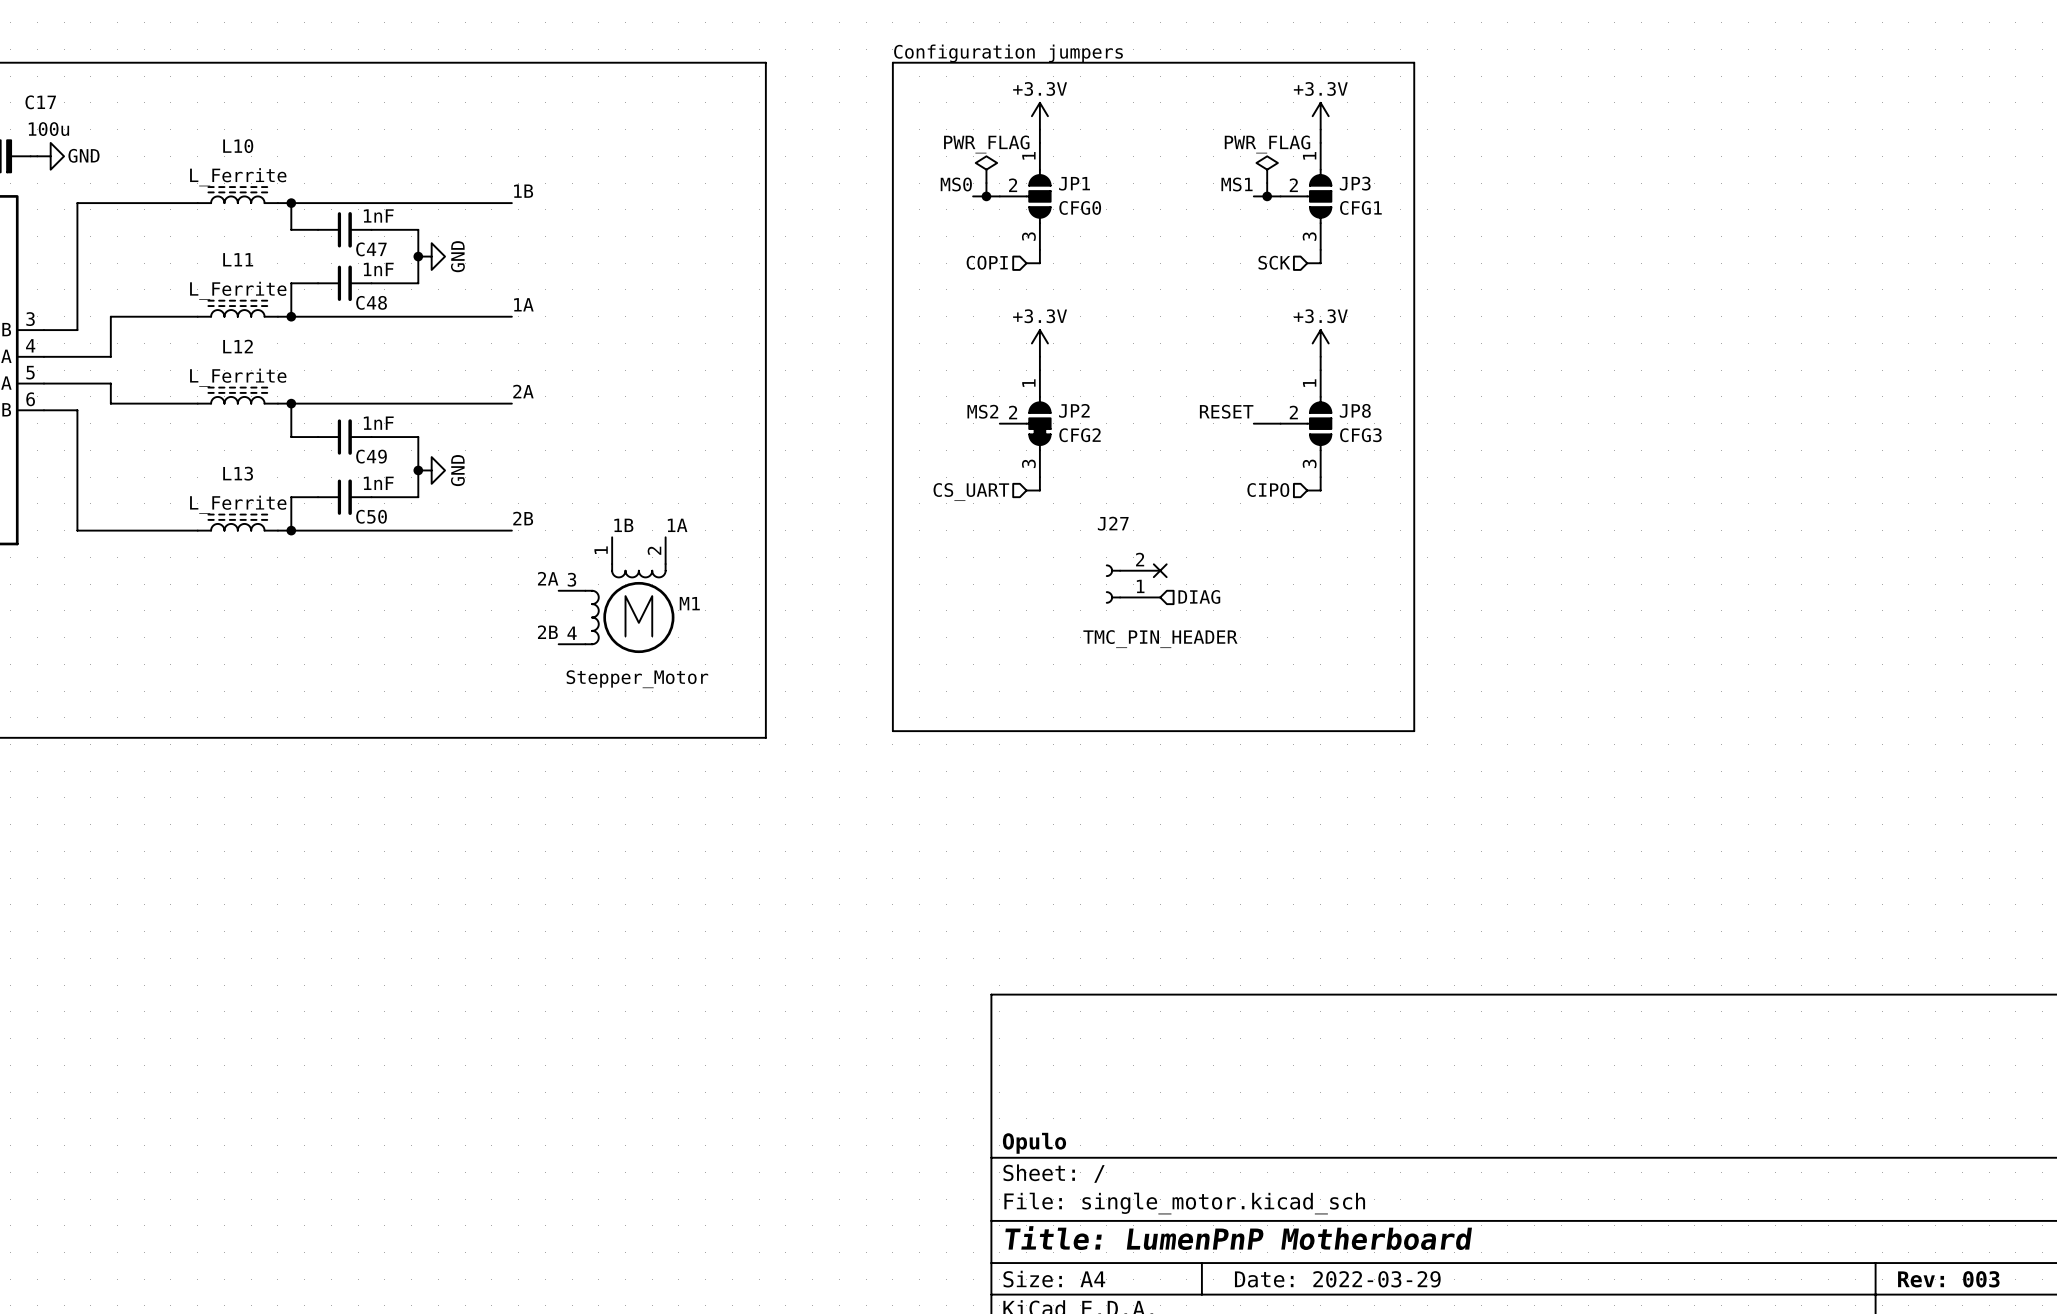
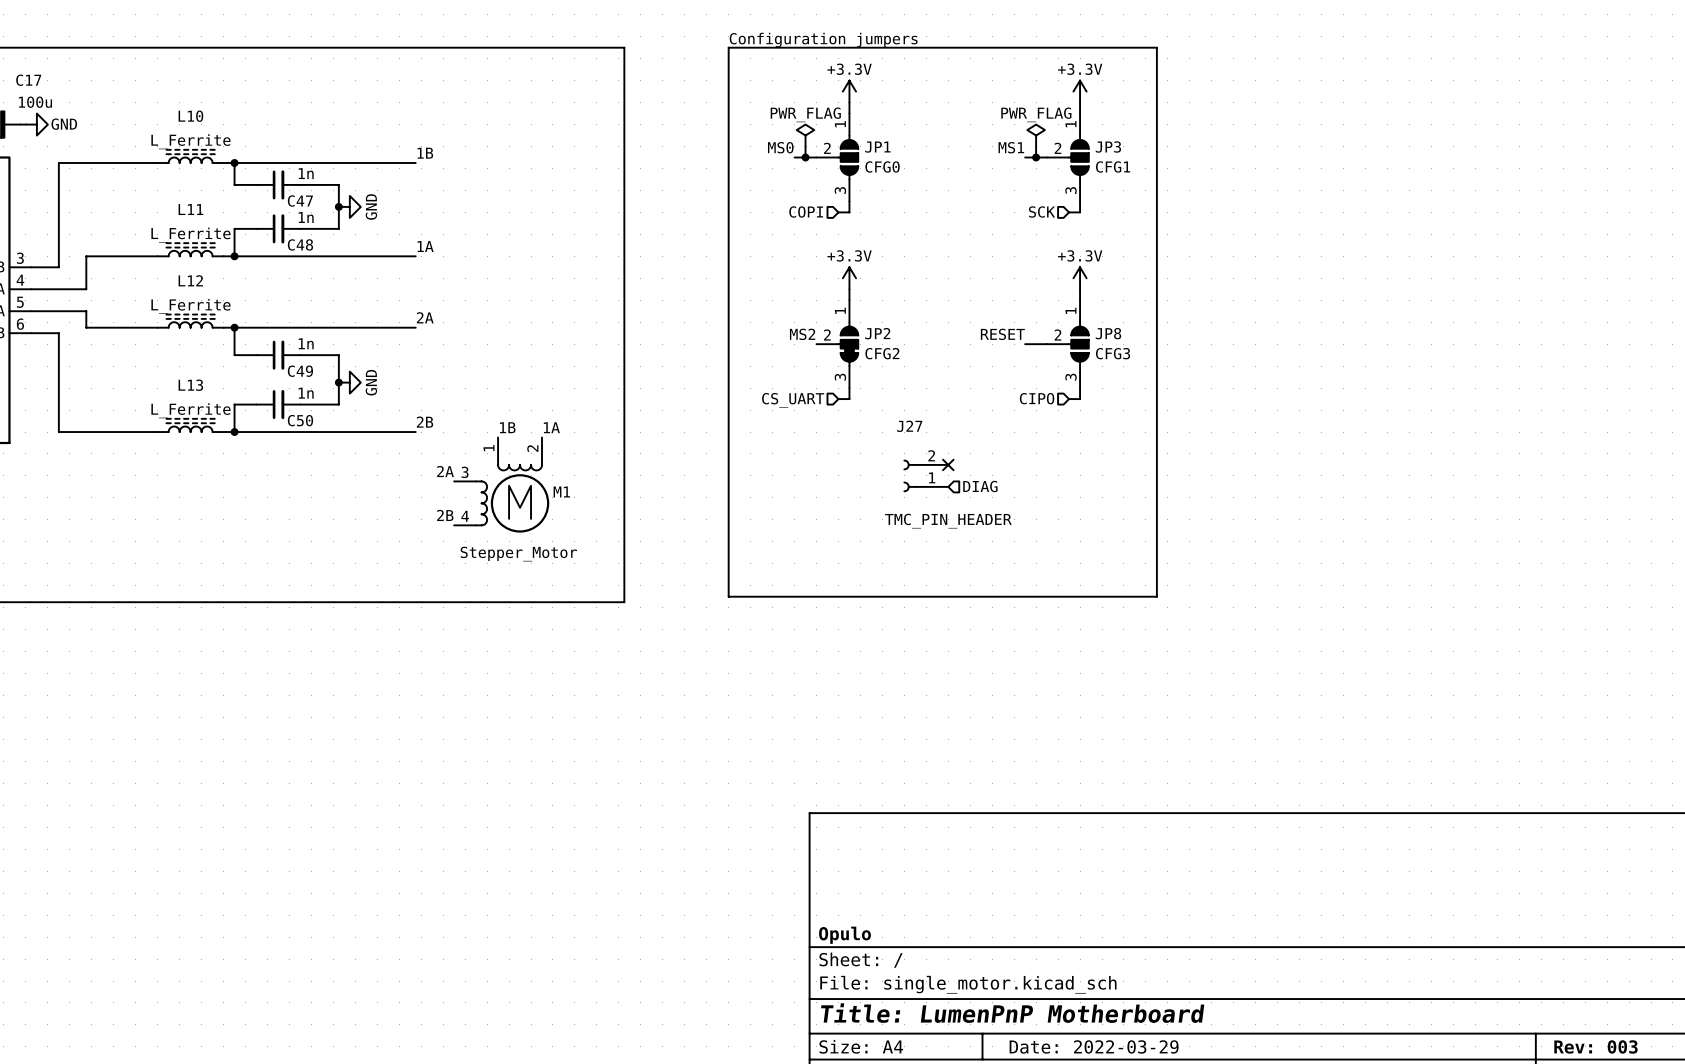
C47 value: 1nF (378, 215) -> 1n (306, 173)
C48 value: 1nF (378, 269) -> 1n (306, 217)
C49 value: 1nF (378, 423) -> 1n (306, 343)
C50 value: 1nF (378, 483) -> 1n (306, 393)

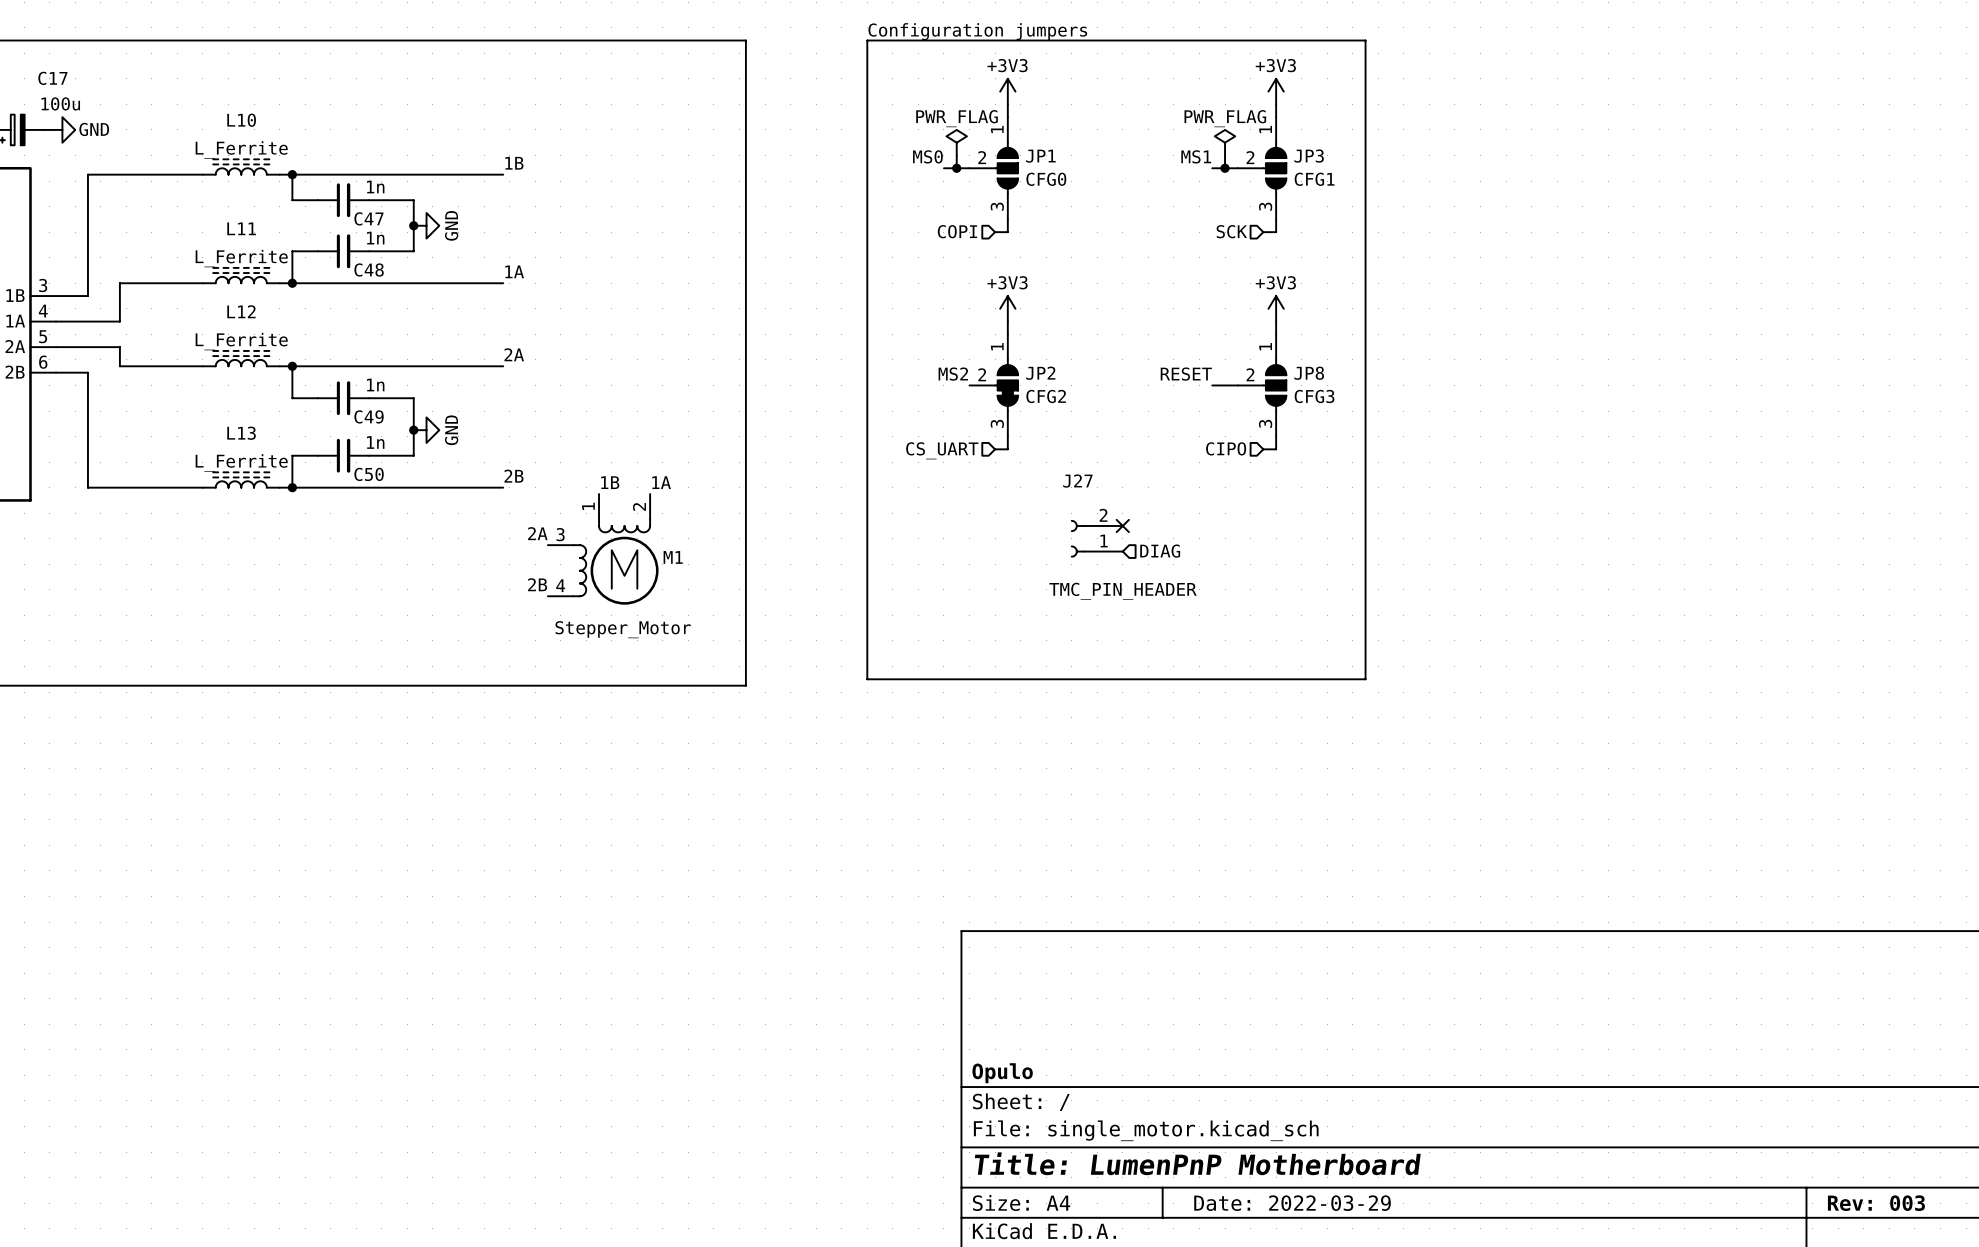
power symbol: +3.3V (849, 91) -> +3V3 (1007, 91)
power symbol: +3.3V (1080, 91) -> +3V3 (1276, 91)
power symbol: +3.3V (849, 278) -> +3V3 (1007, 308)
power symbol: +3.3V (1080, 278) -> +3V3 (1276, 308)

